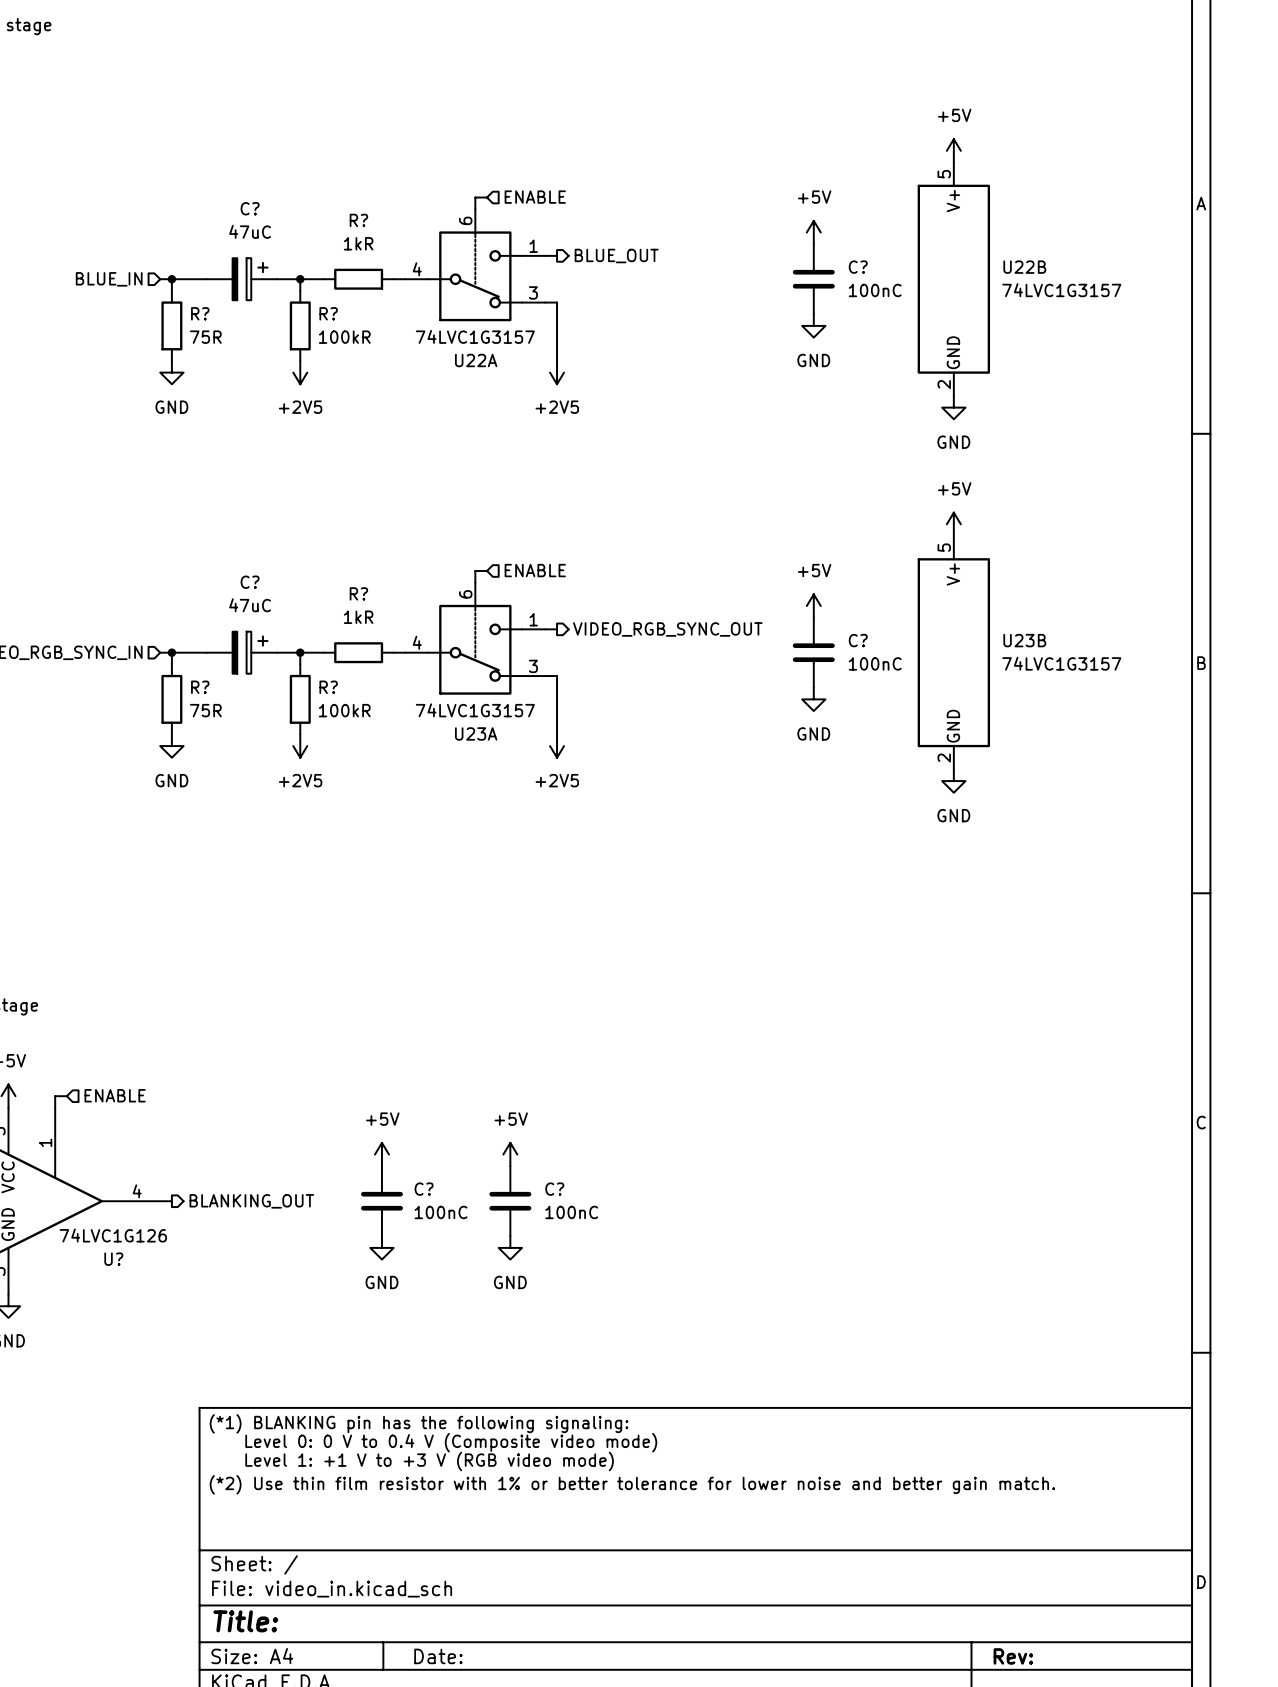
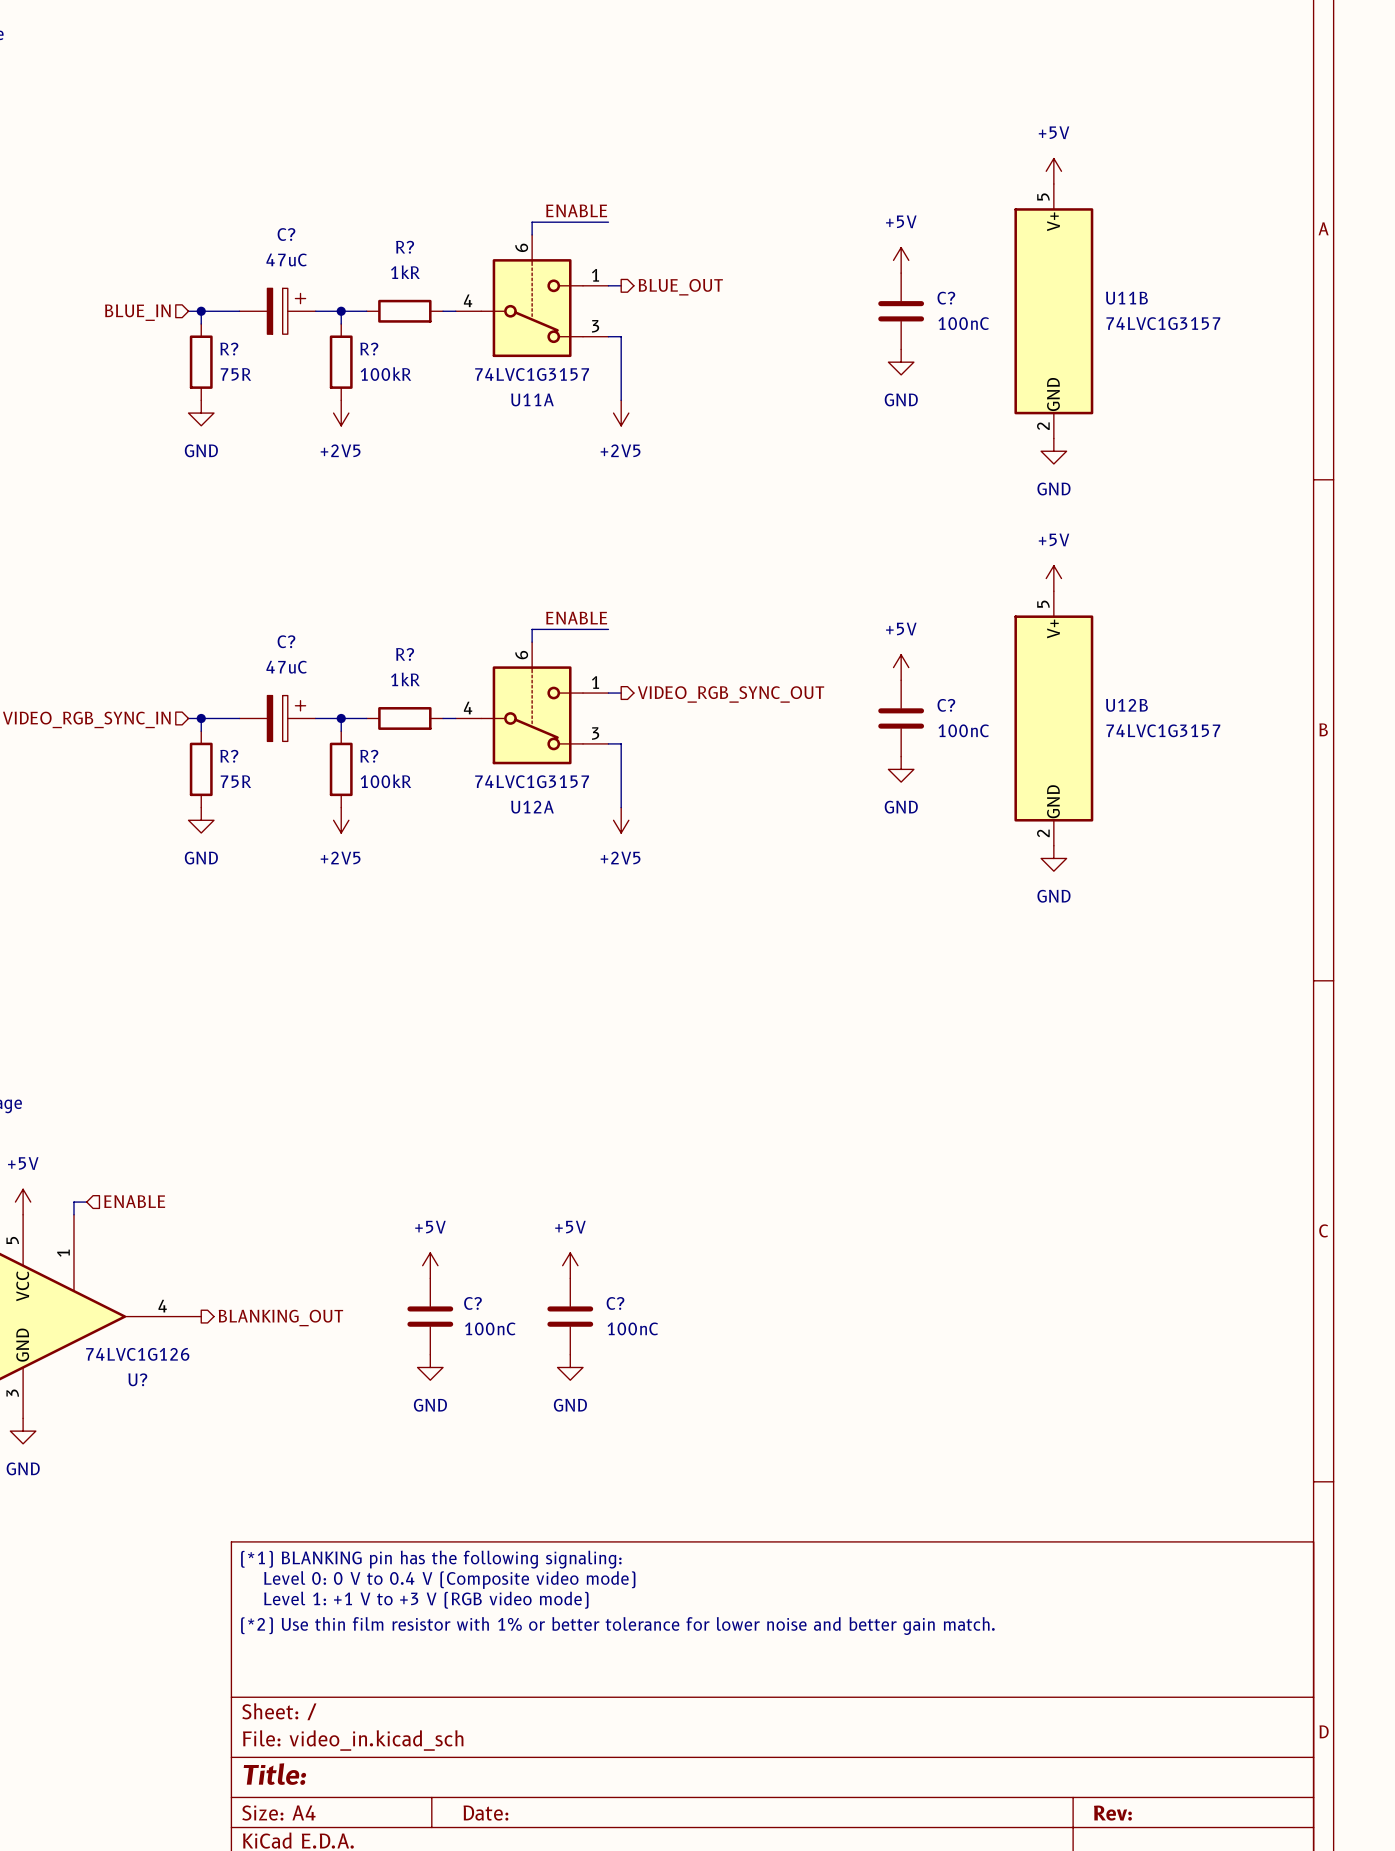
label: none -> ENABLE (576, 210)
wire: none -> (544, 222) (608, 222)
hierarchical label: ENABLE (535, 197) -> none
U22B name: U22B (1024, 267) -> U11B (1126, 298)
U22A name: U22A (476, 360) -> U11A (532, 399)
label: none -> ENABLE (576, 618)
hierarchical label: ENABLE (535, 570) -> none
wire: none -> (544, 629) (608, 629)
U23B name: U23B (1024, 640) -> U12B (1126, 705)
U23A name: U23A (476, 733) -> U12A (532, 807)

